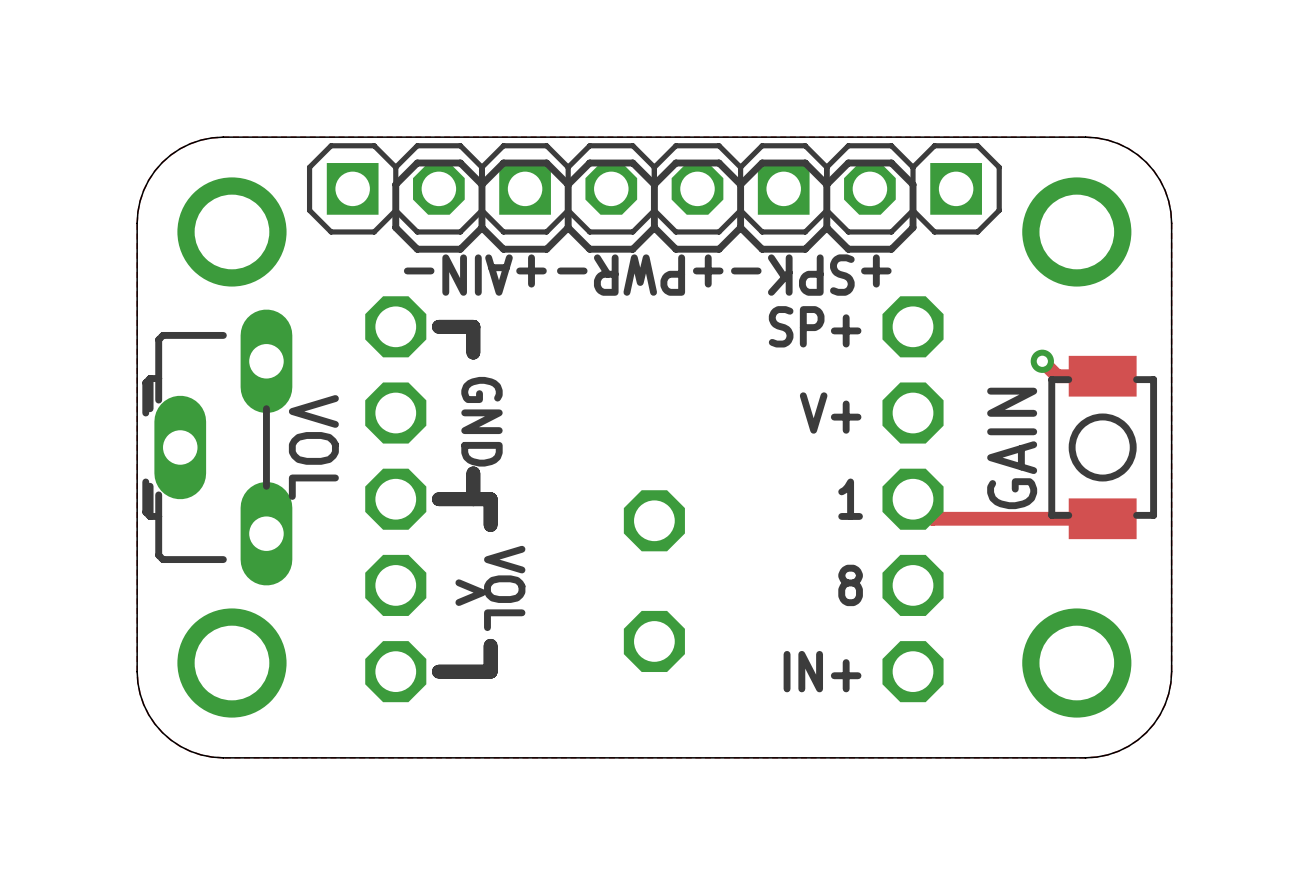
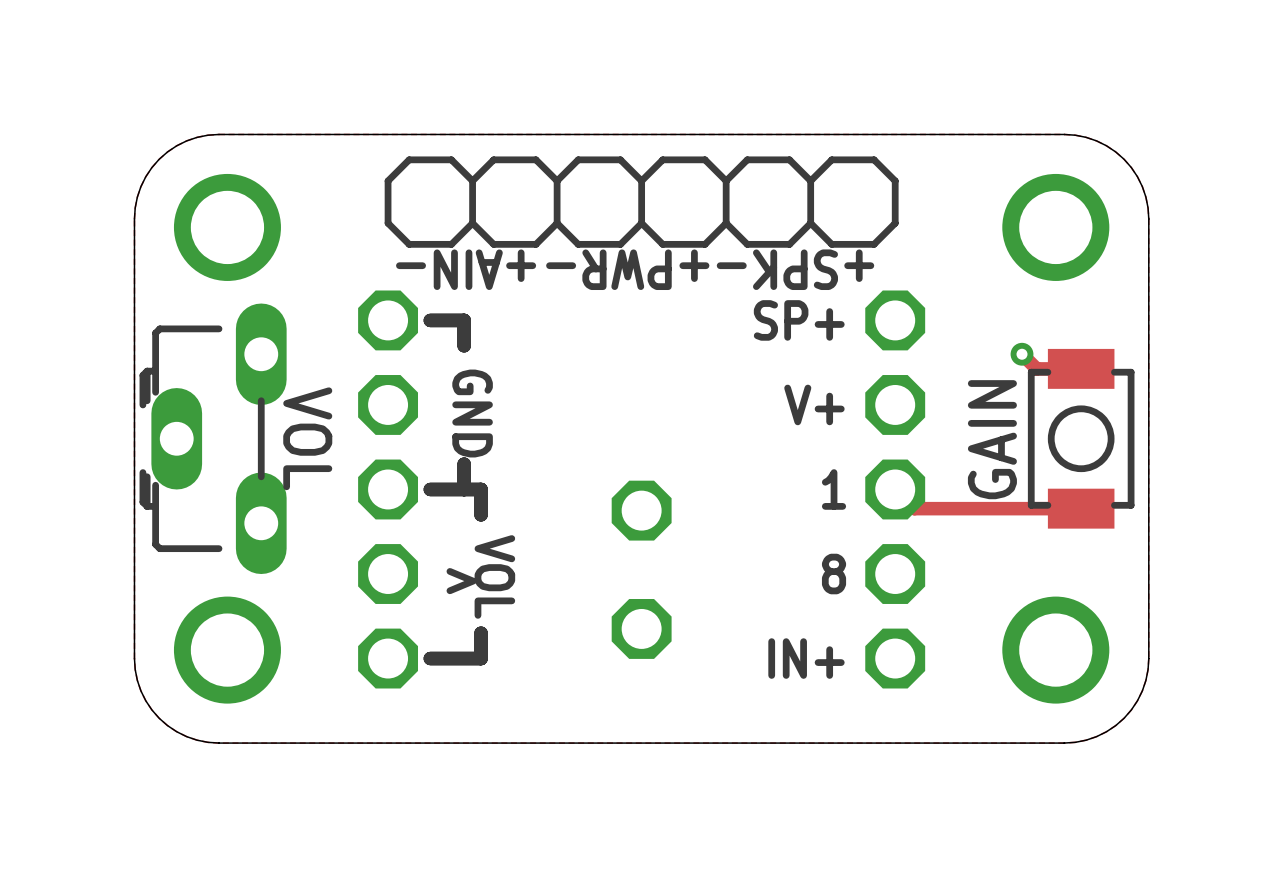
part: (395, 188) -> none
part: (568, 188) -> none
part: (740, 188) -> none
part: (913, 188) -> none

